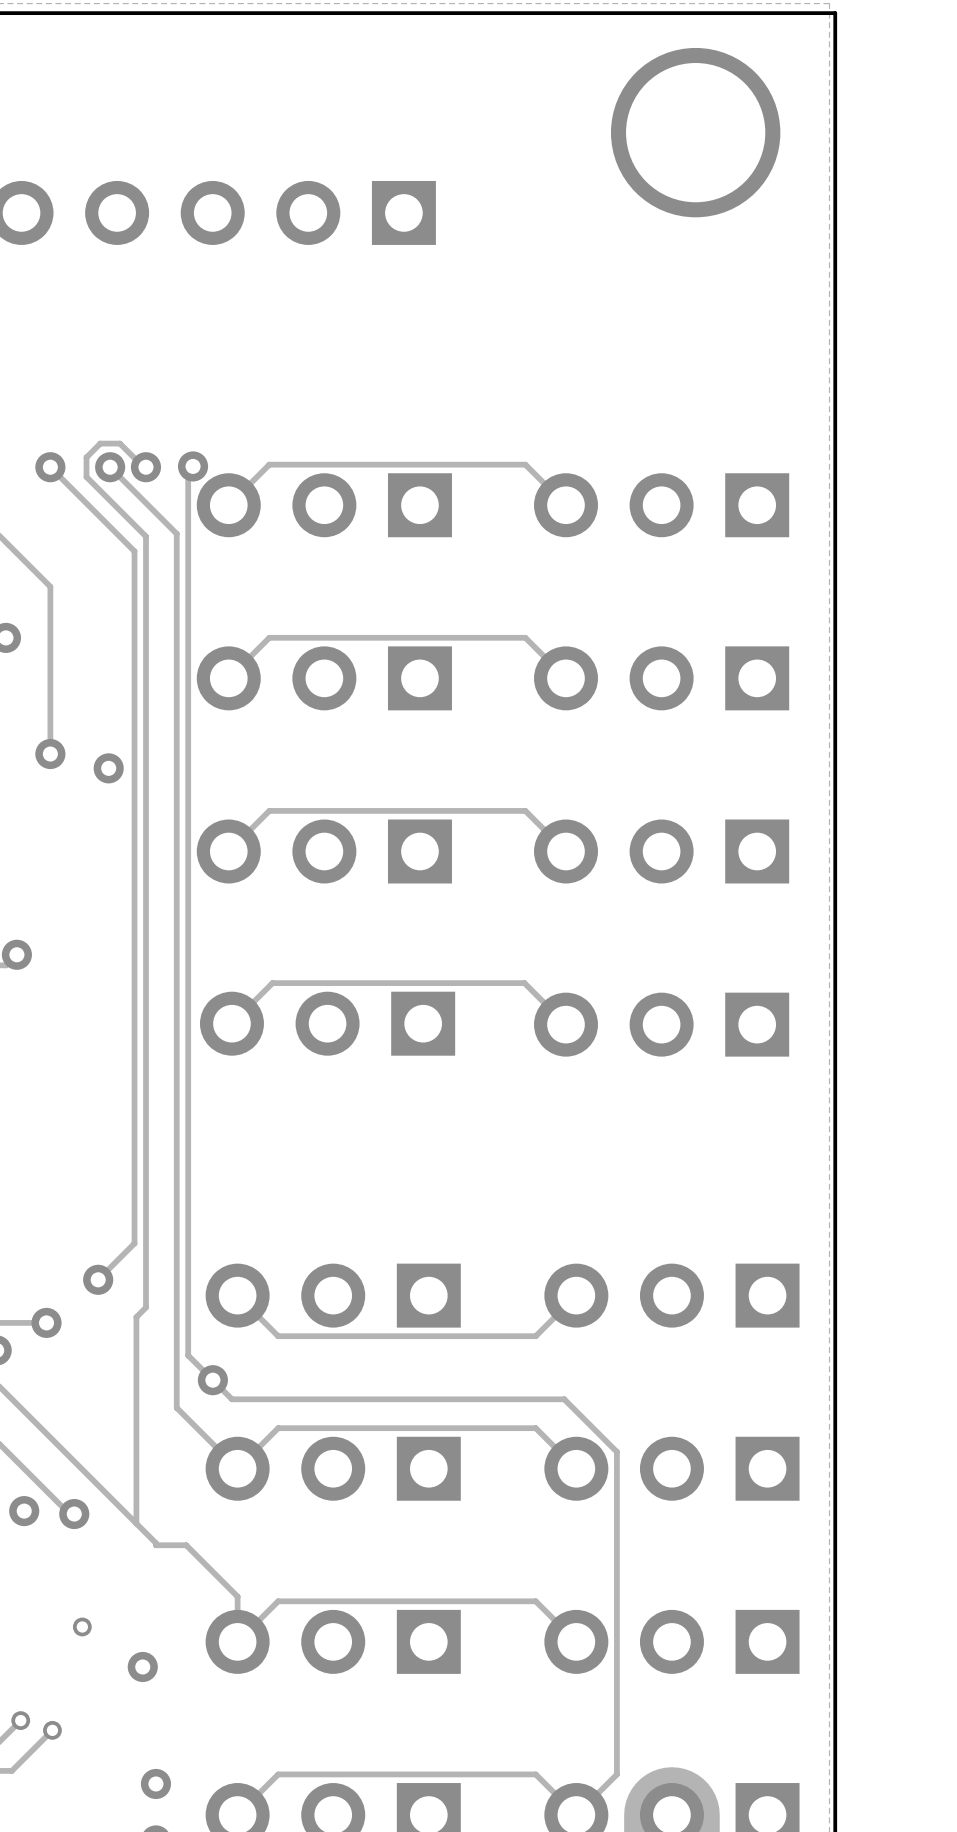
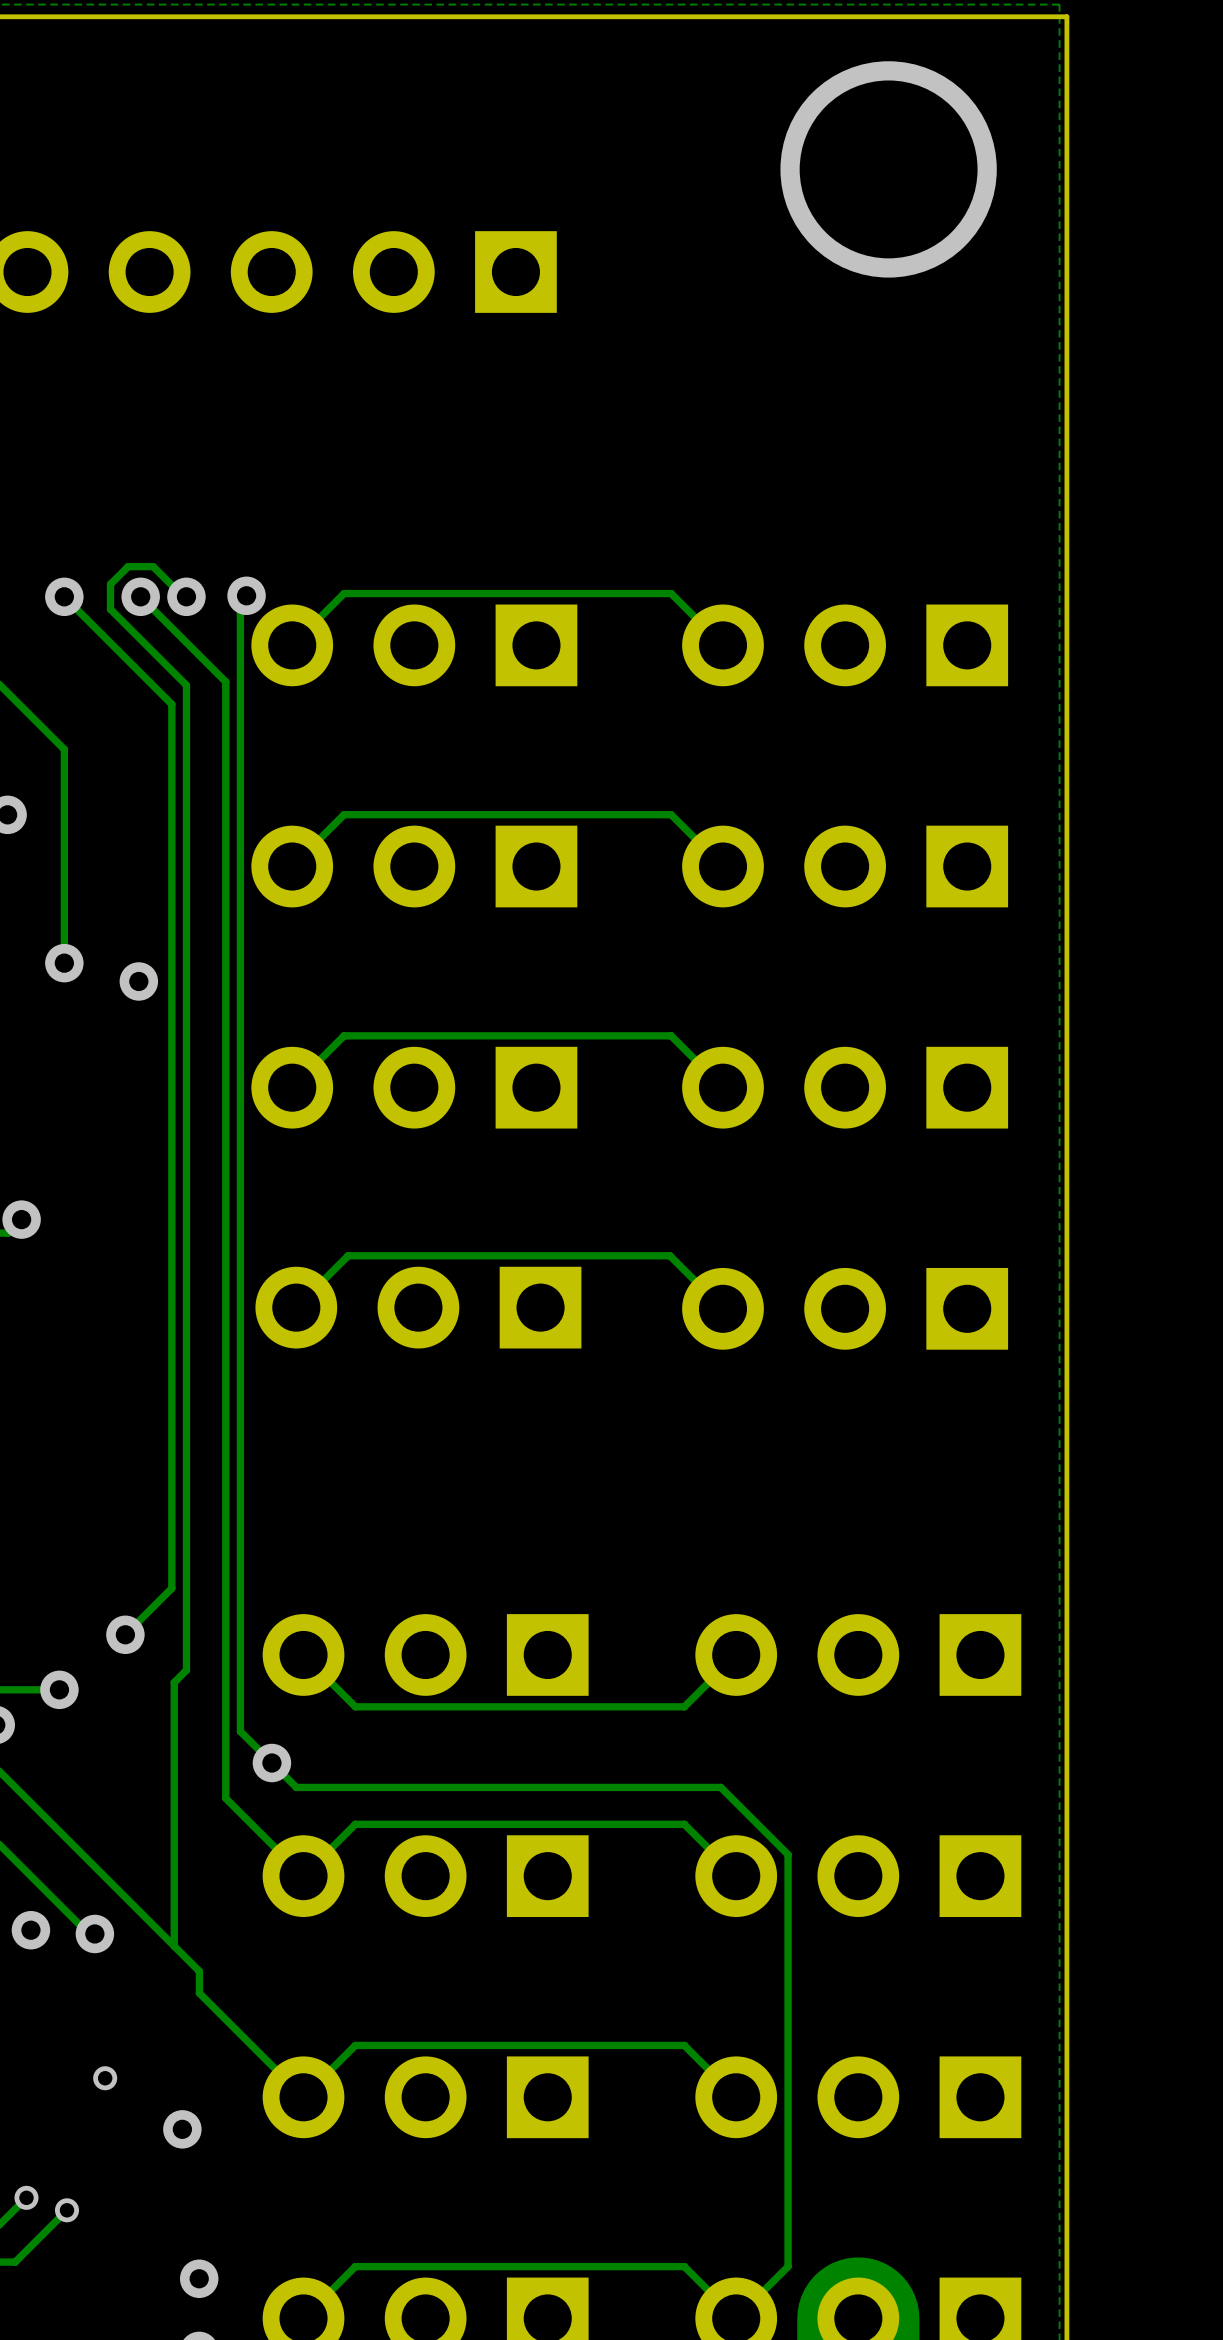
track: (156, 1545) (186, 1545) (237, 1596) (237, 1641) -> (199, 1973) (199, 1993) (303, 2097)

